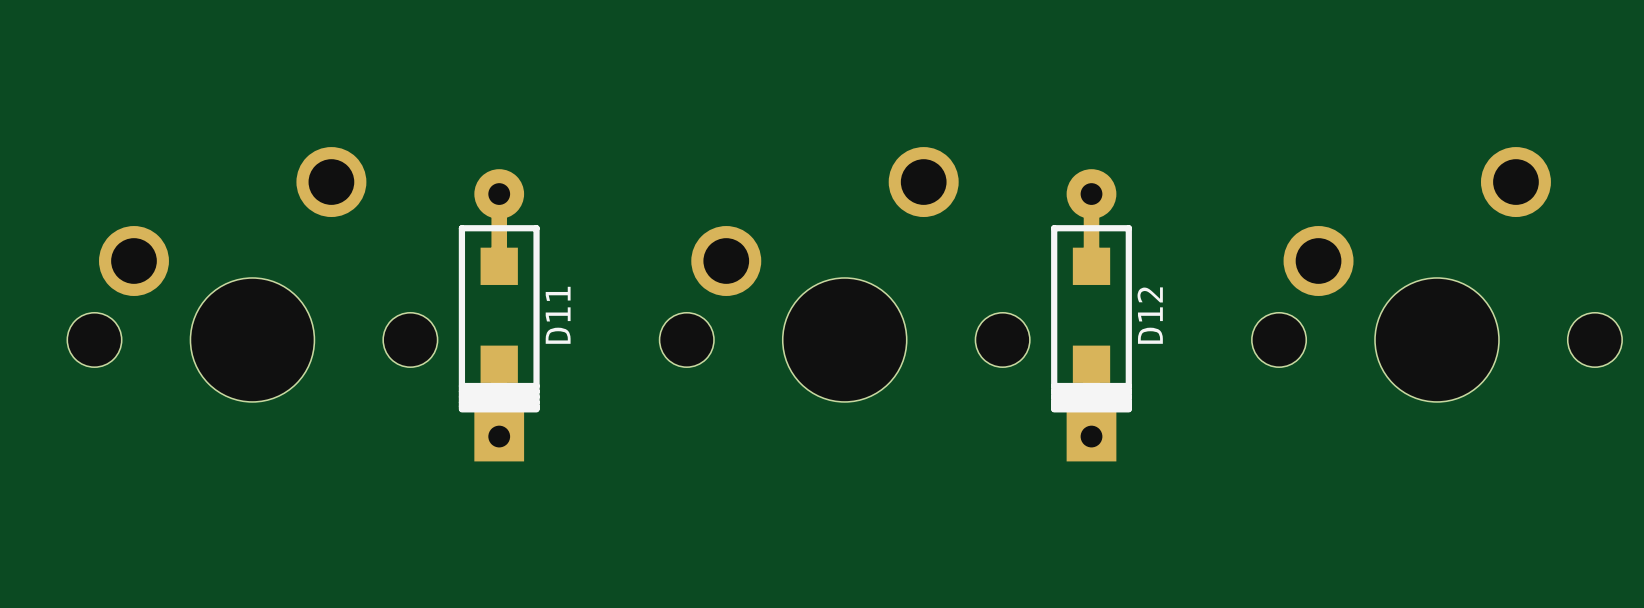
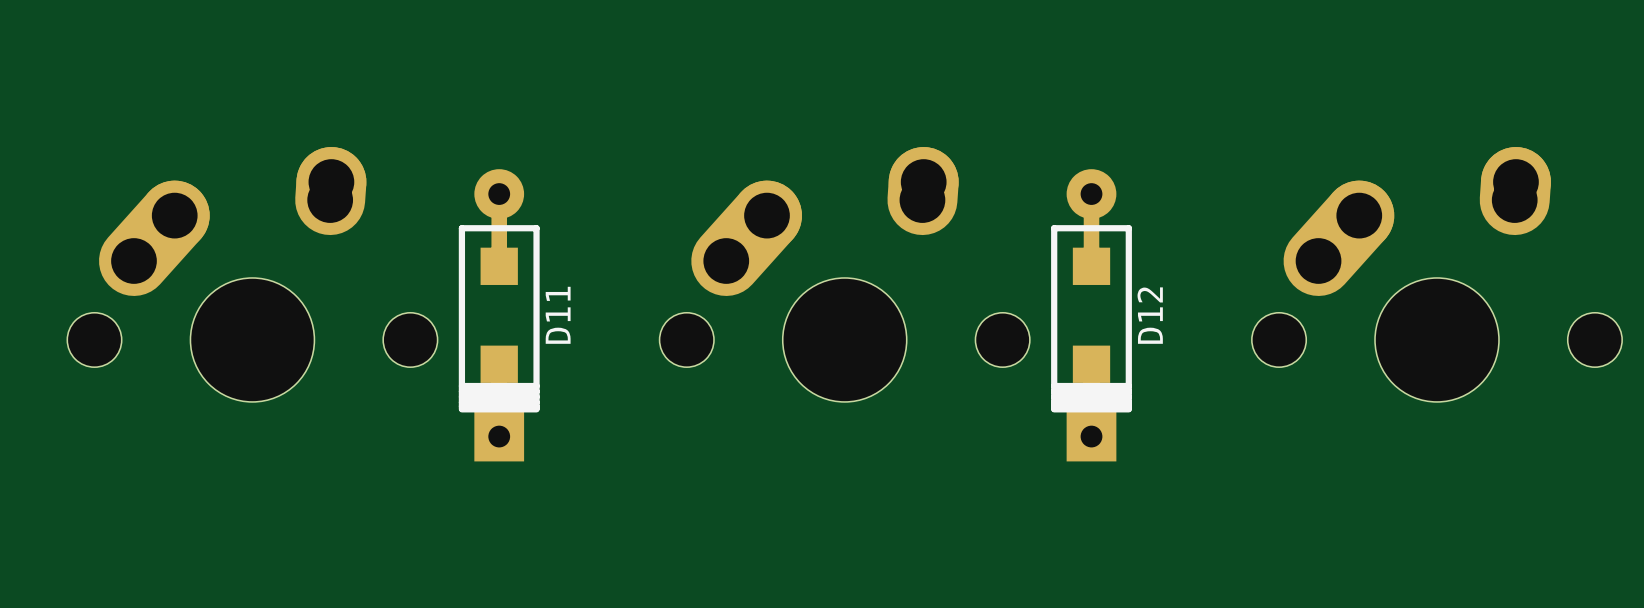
part footprint: [67, 147, 438, 402] -> [67, 147, 438, 402]
part footprint: [659, 147, 1030, 402] -> [659, 147, 1030, 402]
part footprint: [1251, 147, 1623, 402] -> [1251, 147, 1623, 402]

